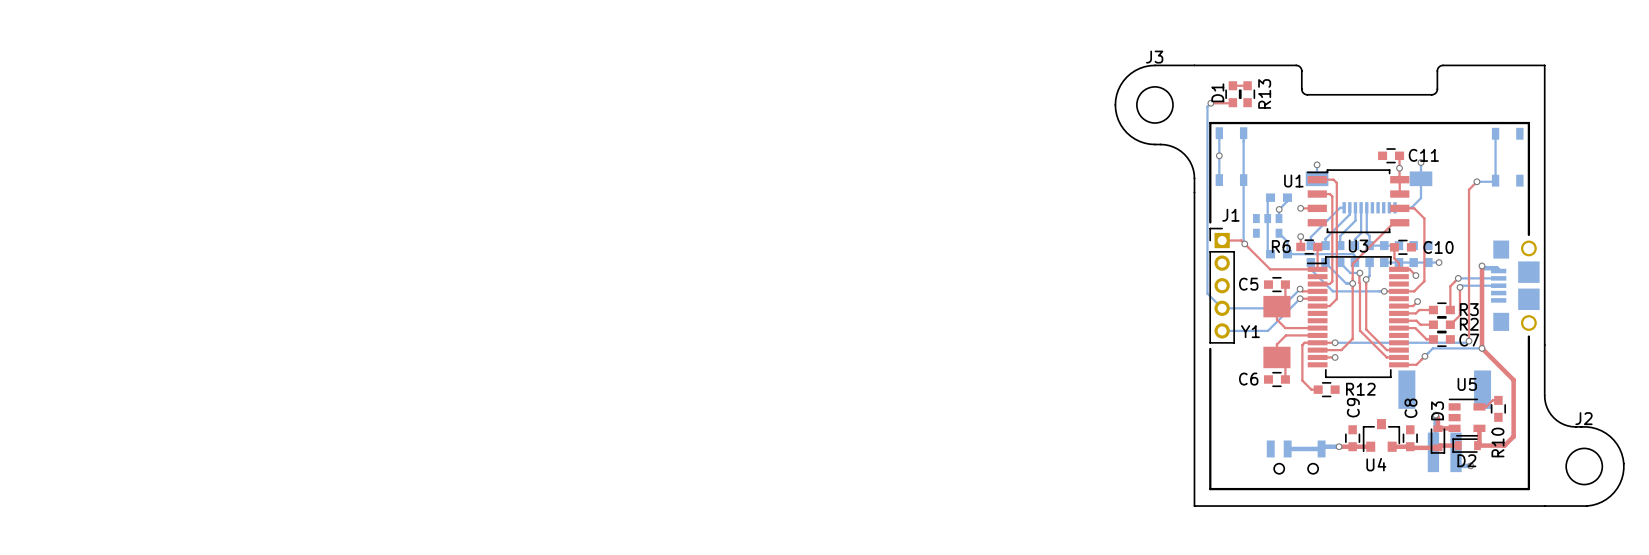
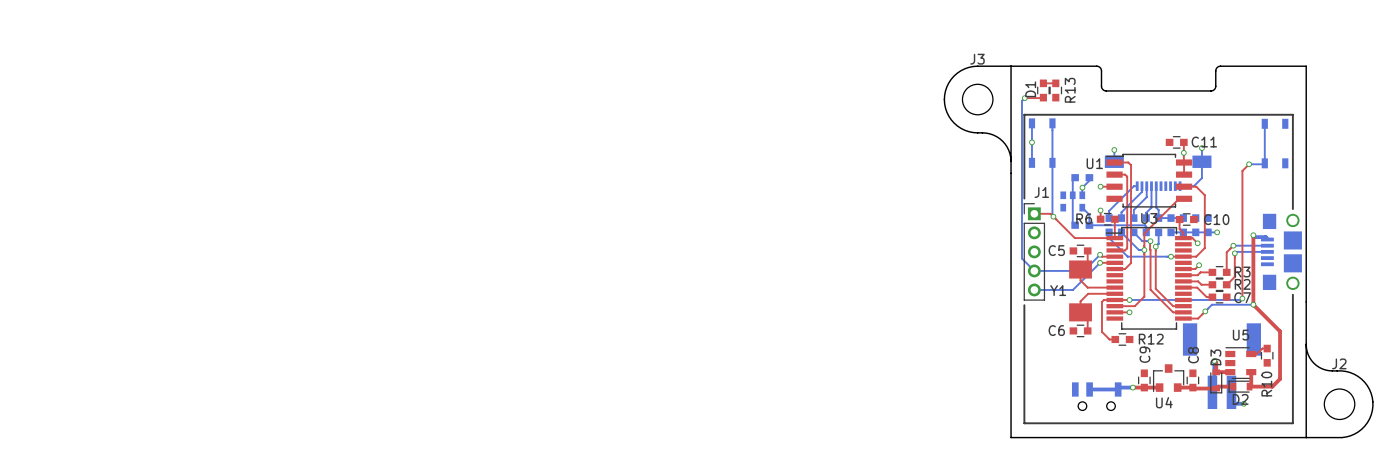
board edge: none -> (1011, 66) (1011, 160)
board edge: none -> (1306, 344) (1306, 437)

